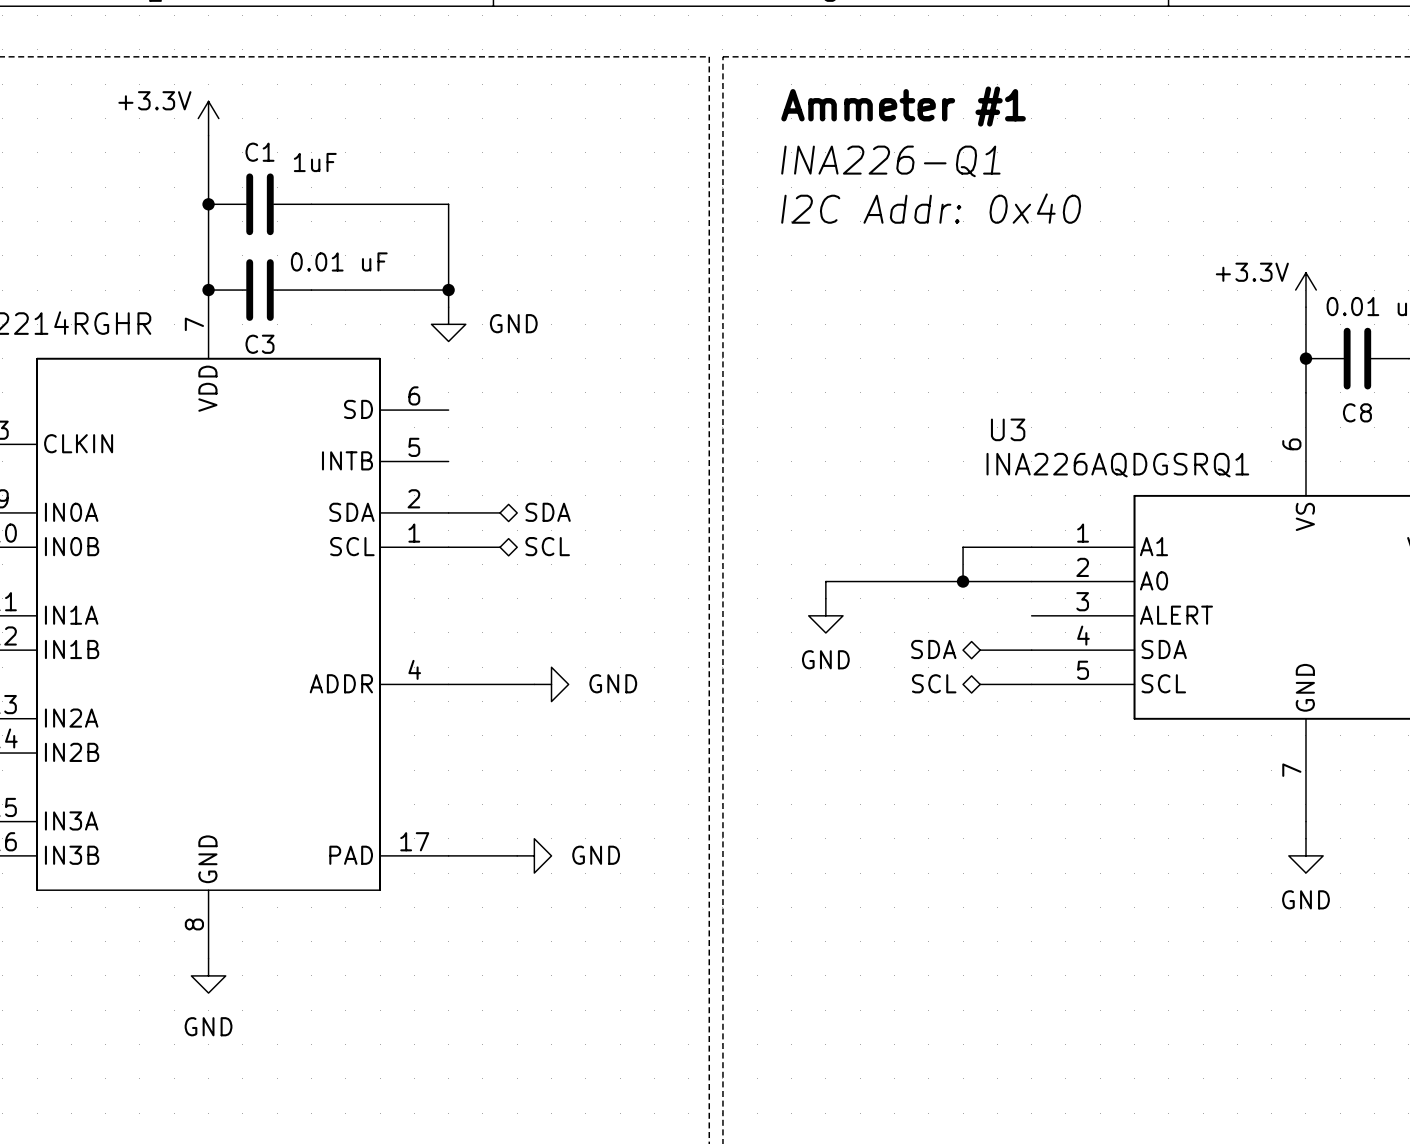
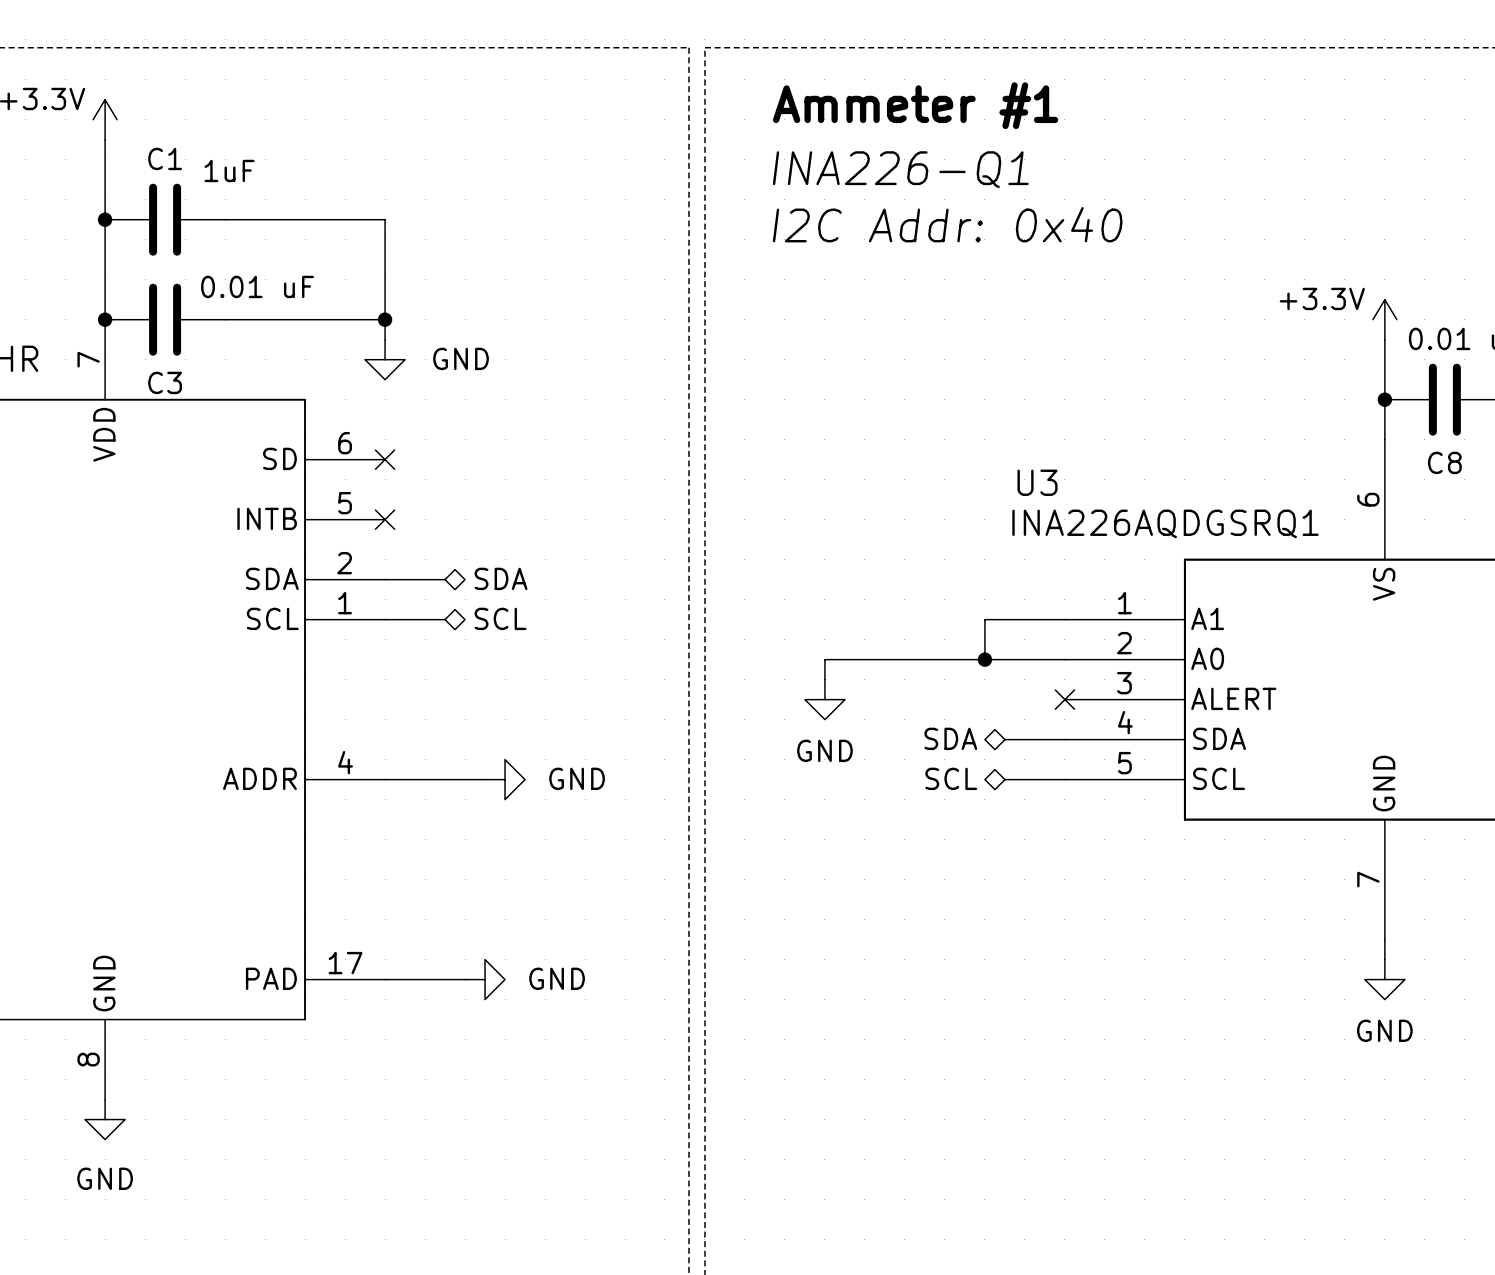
no-connect mark: none -> (385, 459)
no-connect mark: none -> (385, 519)
no-connect mark: none -> (1064, 699)

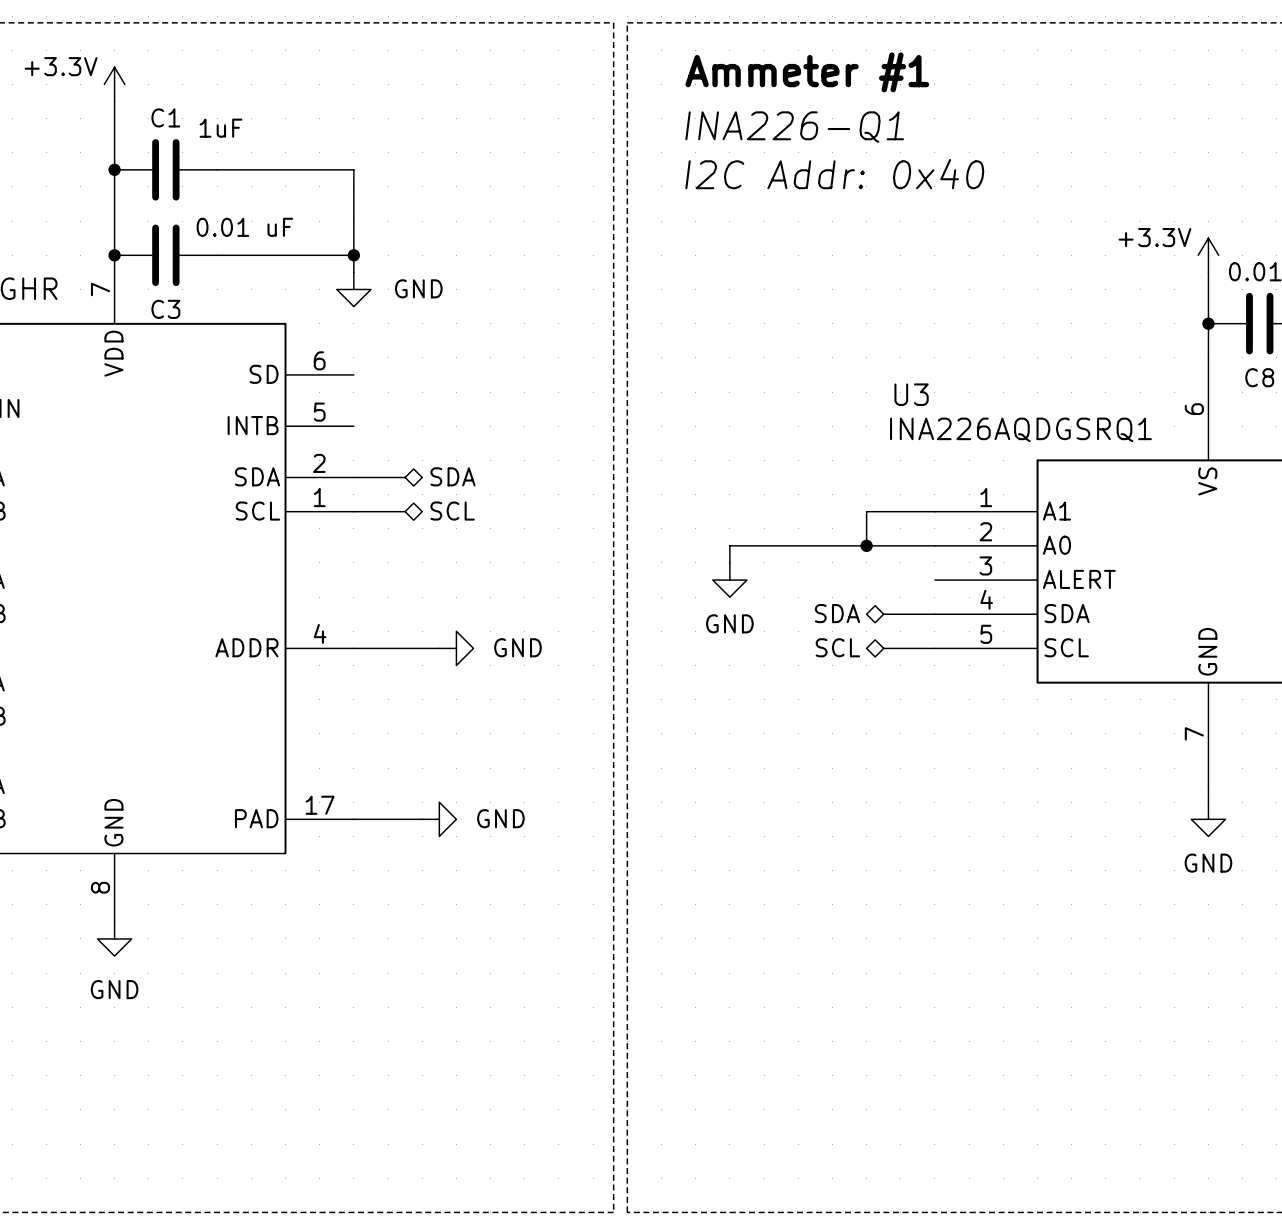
no-connect mark: (385, 459) -> none
no-connect mark: (385, 519) -> none
no-connect mark: (1064, 699) -> none

